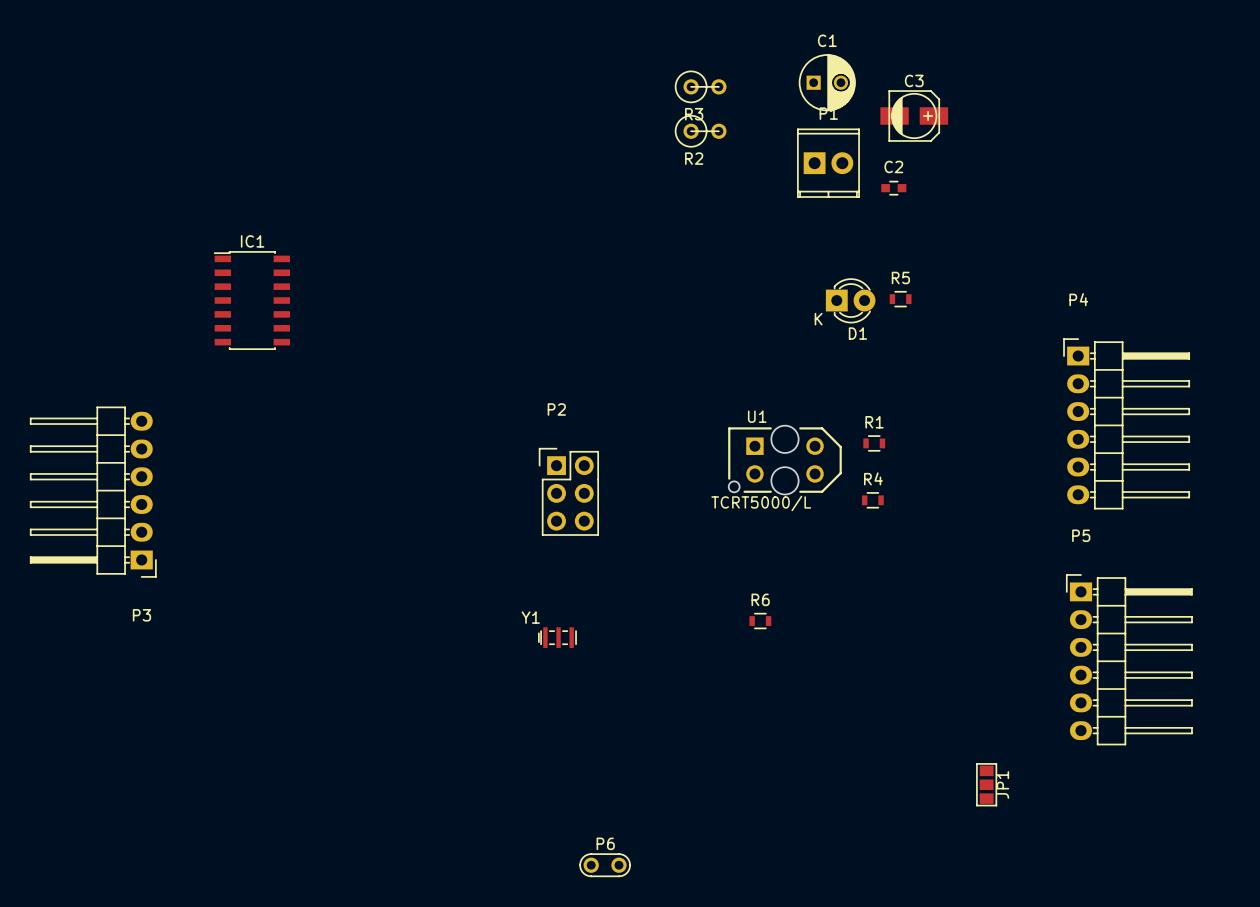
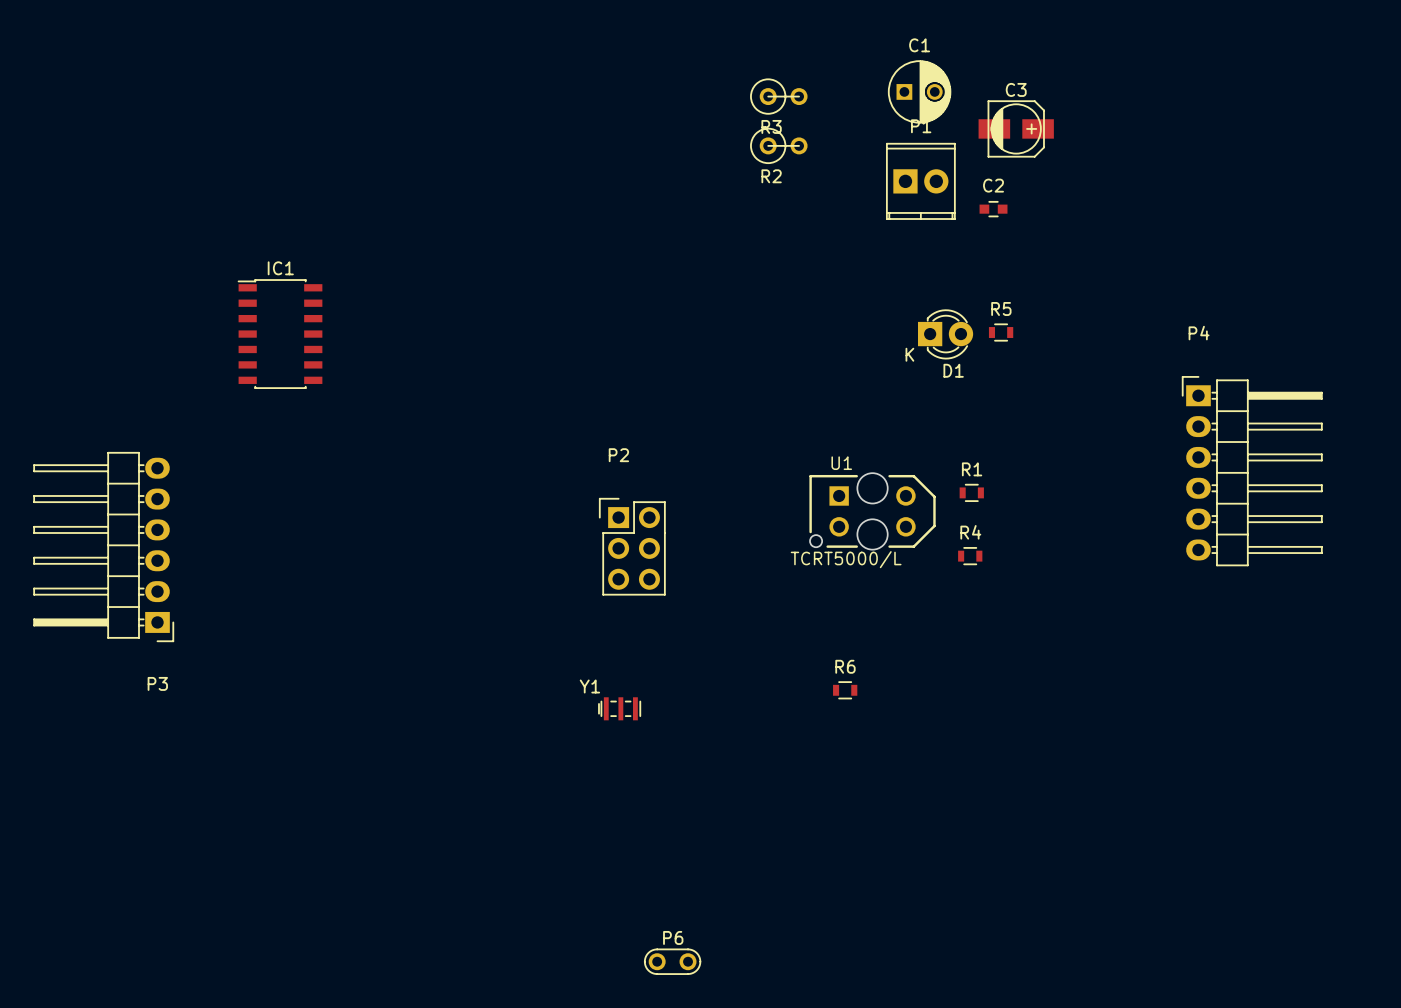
P5: (1129, 659) -> none
JP1: (986, 784) -> none

